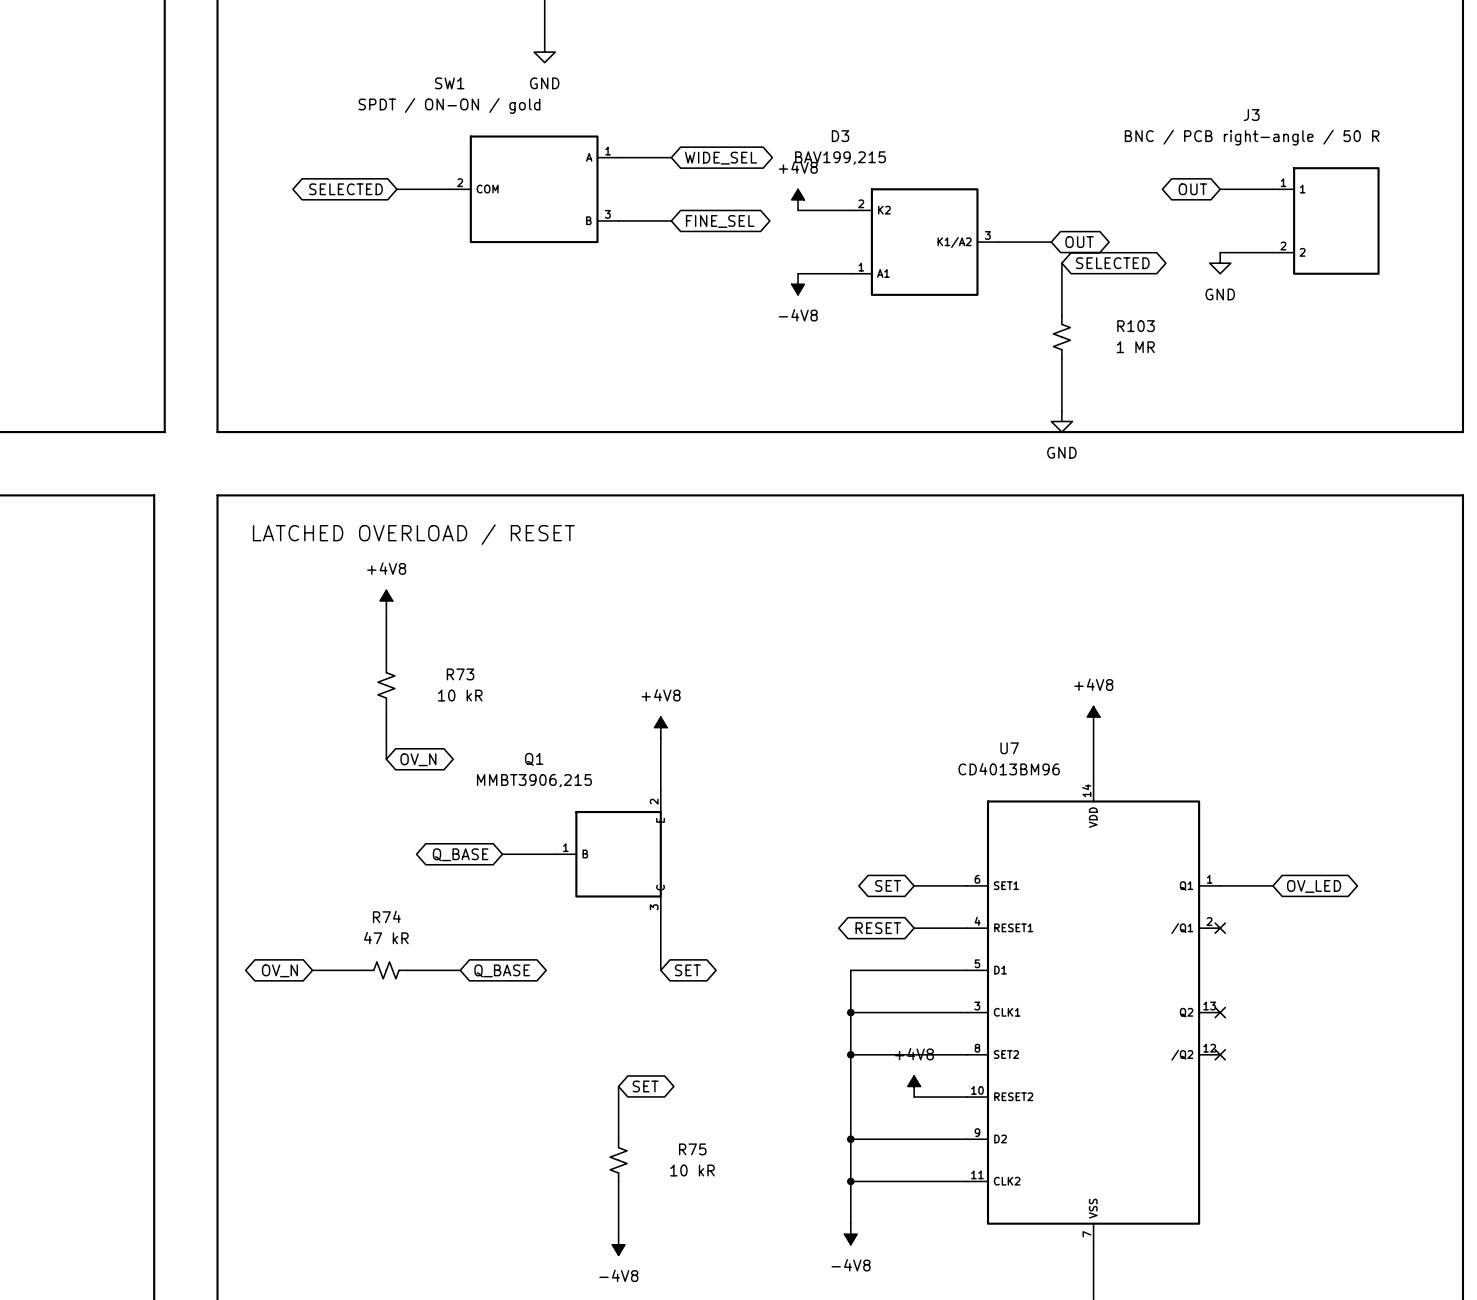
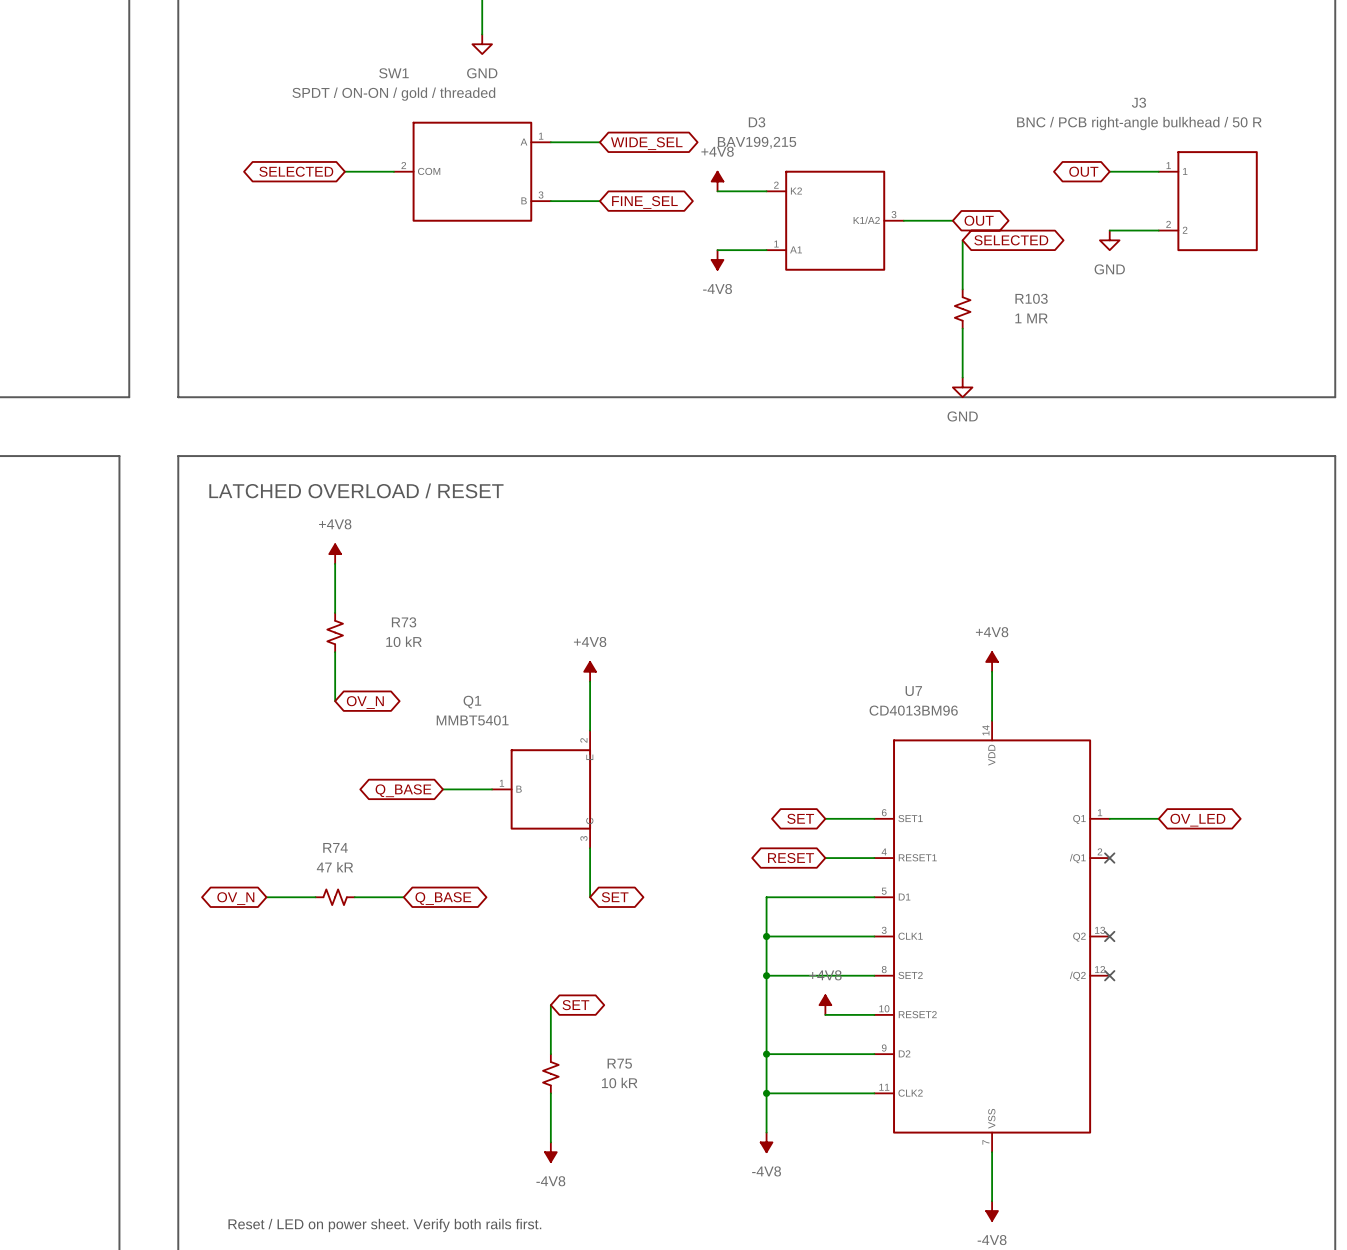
SW1 value: SPDT / ON-ON / gold (449, 105) -> SPDT / ON-ON / gold / threaded (393, 94)
J3 value: BNC / PCB right-angle / 50 R (1252, 137) -> BNC / PCB right-angle bulkhead / 50 R (1139, 123)
Q1 value: MMBT3906,215 (534, 780) -> MMBT5401 (472, 720)

